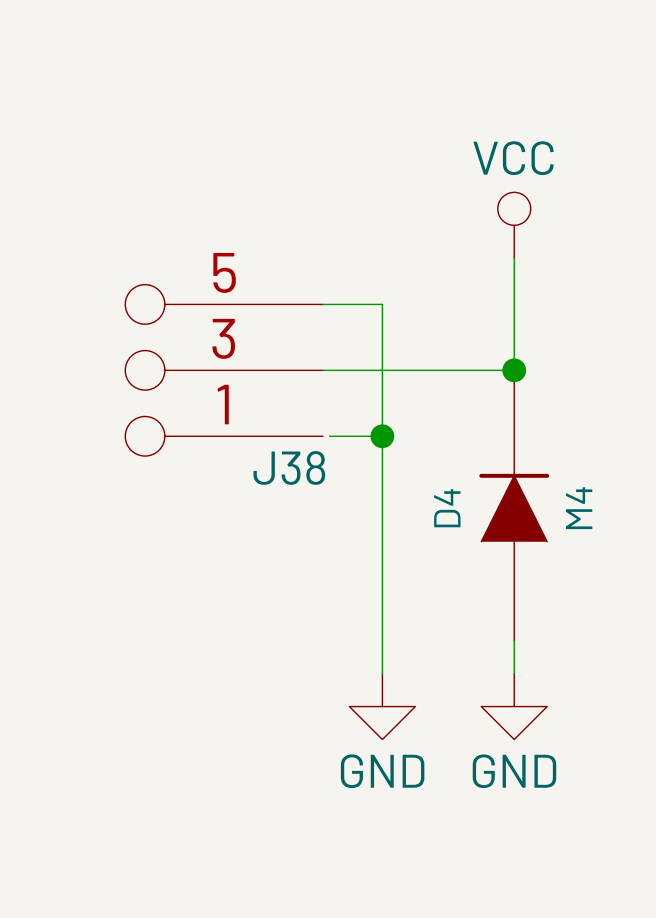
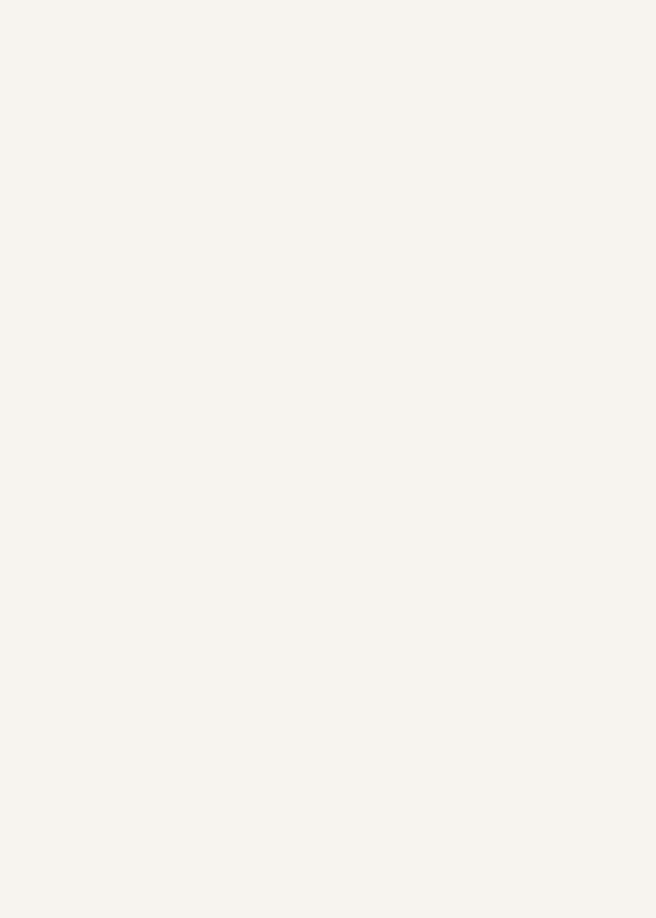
power symbol: VCC (514, 225) -> none
wire: (514, 258) (514, 376) -> none
wire: (323, 304) (382, 304) (382, 673) -> none
J38: (224, 370) -> none
wire: (323, 370) (514, 370) -> none
junction: (514, 370) -> none
wire: (329, 436) (382, 436) -> none
junction: (382, 436) -> none
D4: M4 (514, 508) -> none
wire: (514, 640) (514, 673) -> none
power symbol: GND (382, 706) -> none
power symbol: GND (514, 706) -> none

